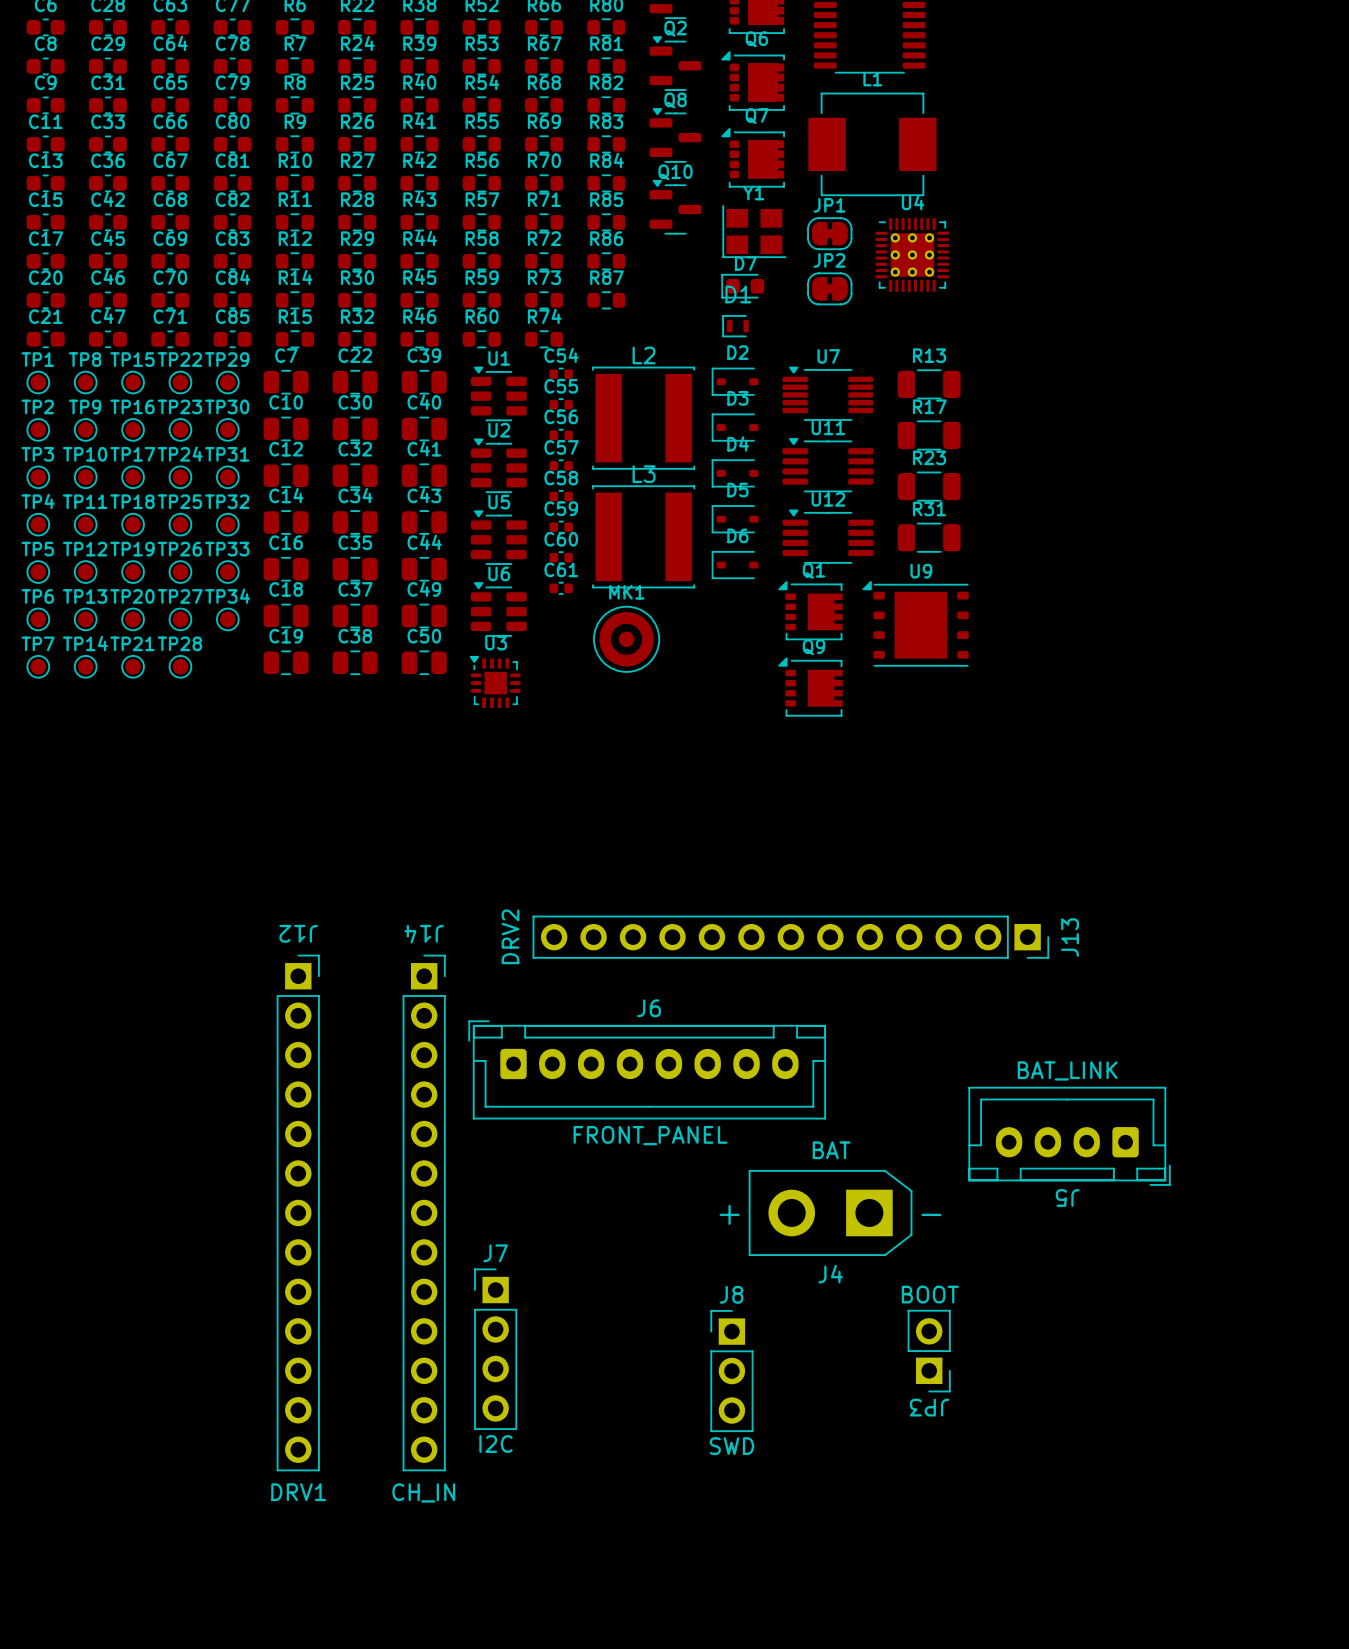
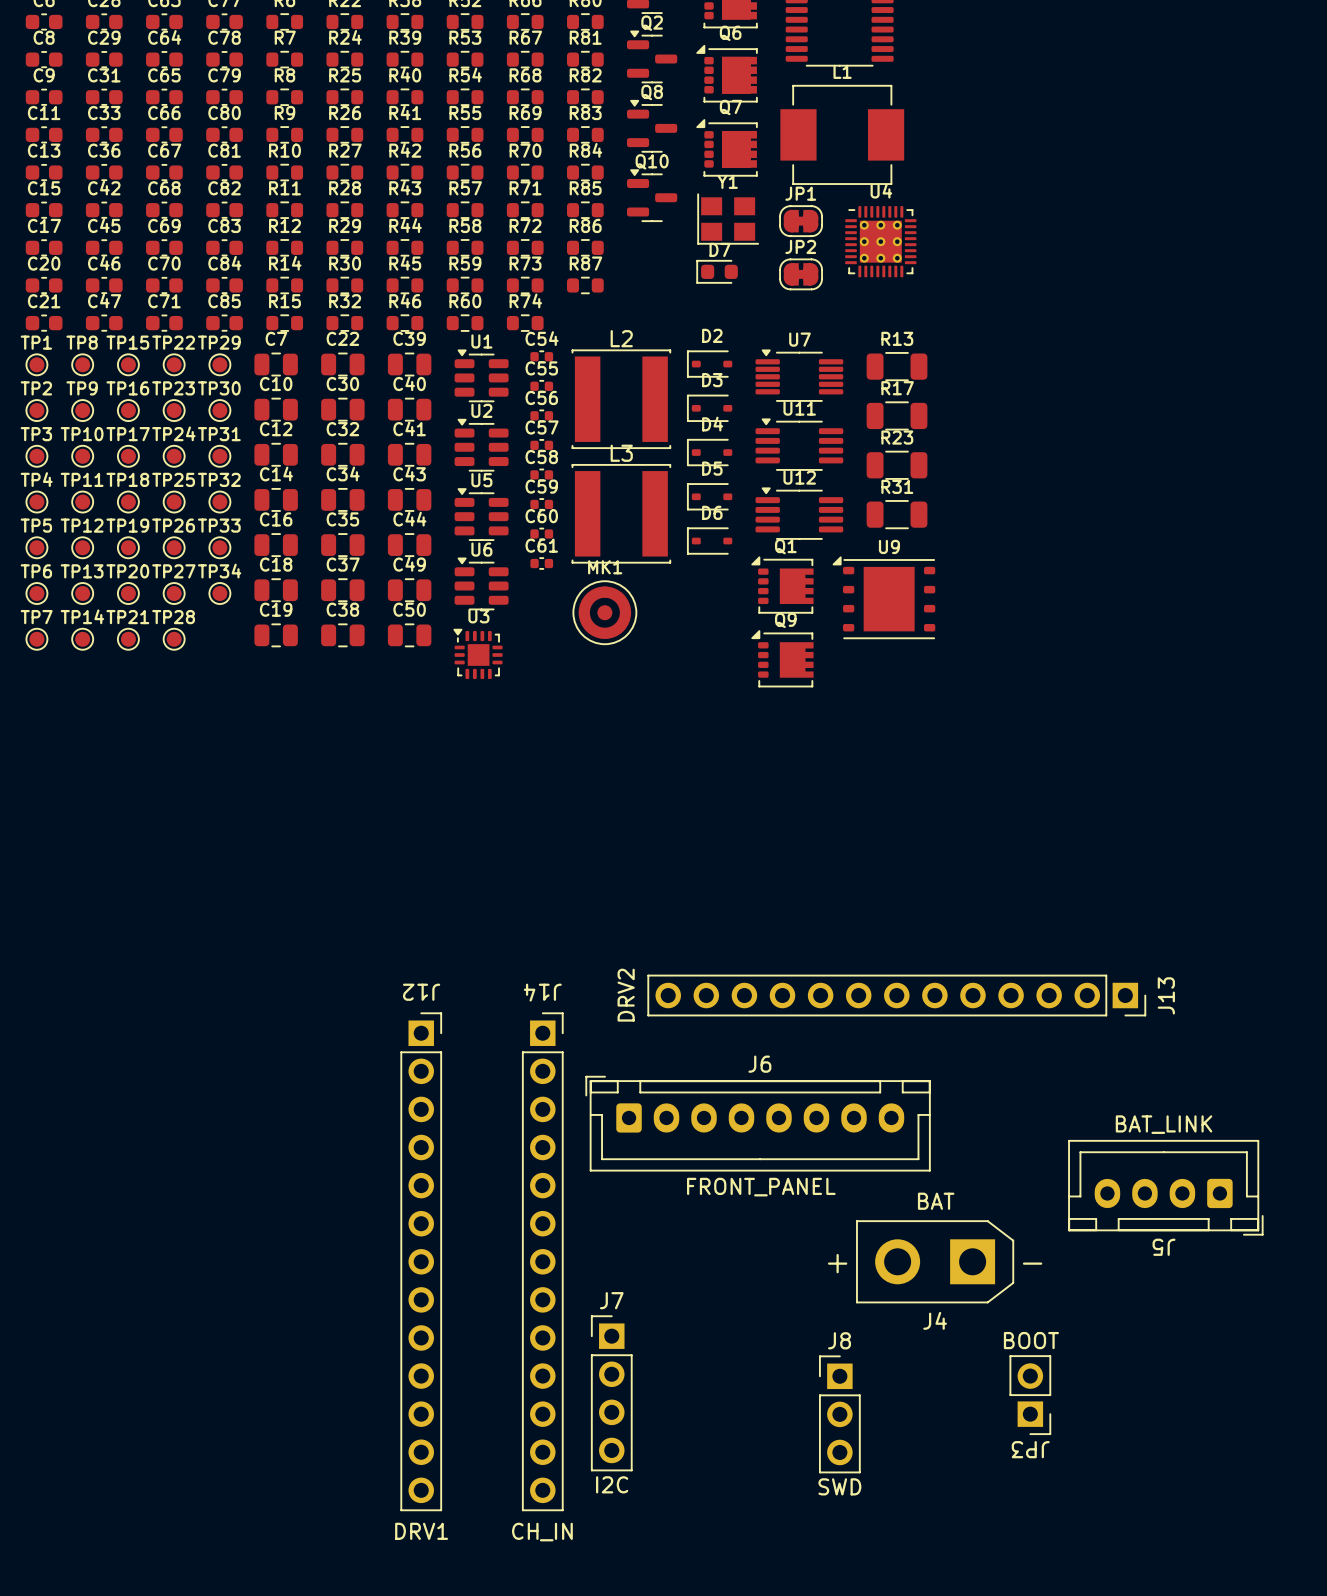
D1: (735, 326) -> none
J13 position: (790, 937) -> (896, 995)
J6 position: (647, 1069) -> (758, 1123)
J5 position: (1069, 1136) -> (1165, 1187)
J12 position: (298, 1212) -> (421, 1261)
J14 position: (424, 1212) -> (542, 1261)
J4 position: (830, 1212) -> (935, 1261)
J7 position: (495, 1349) -> (611, 1393)
JP3 position: (929, 1351) -> (1030, 1395)
J8 position: (731, 1371) -> (839, 1414)

